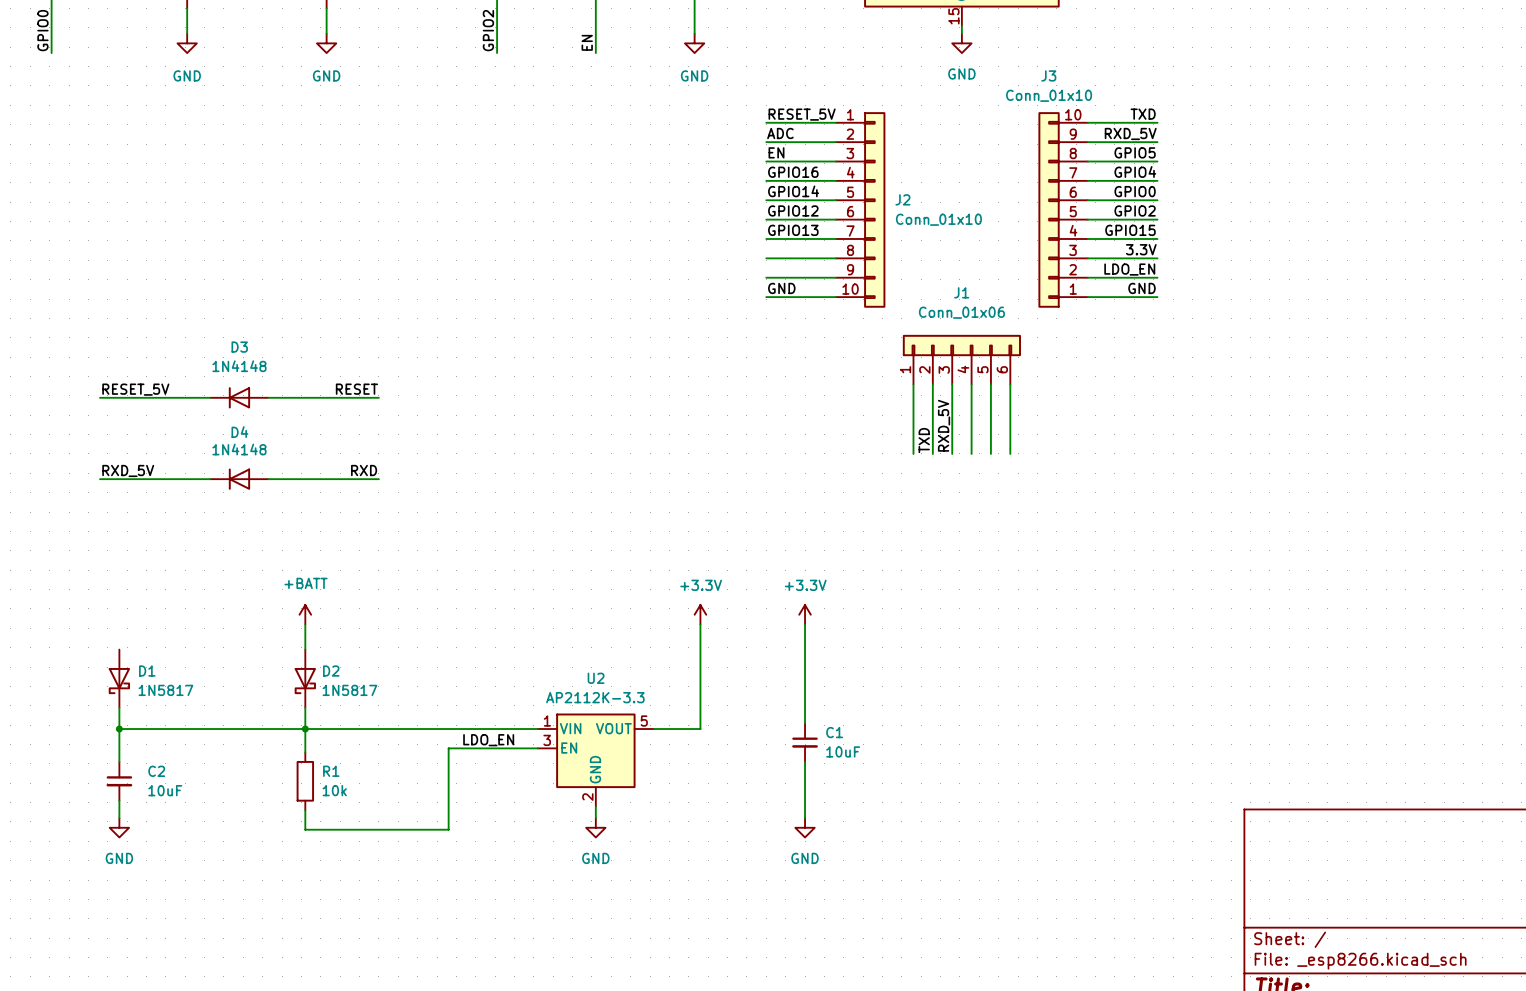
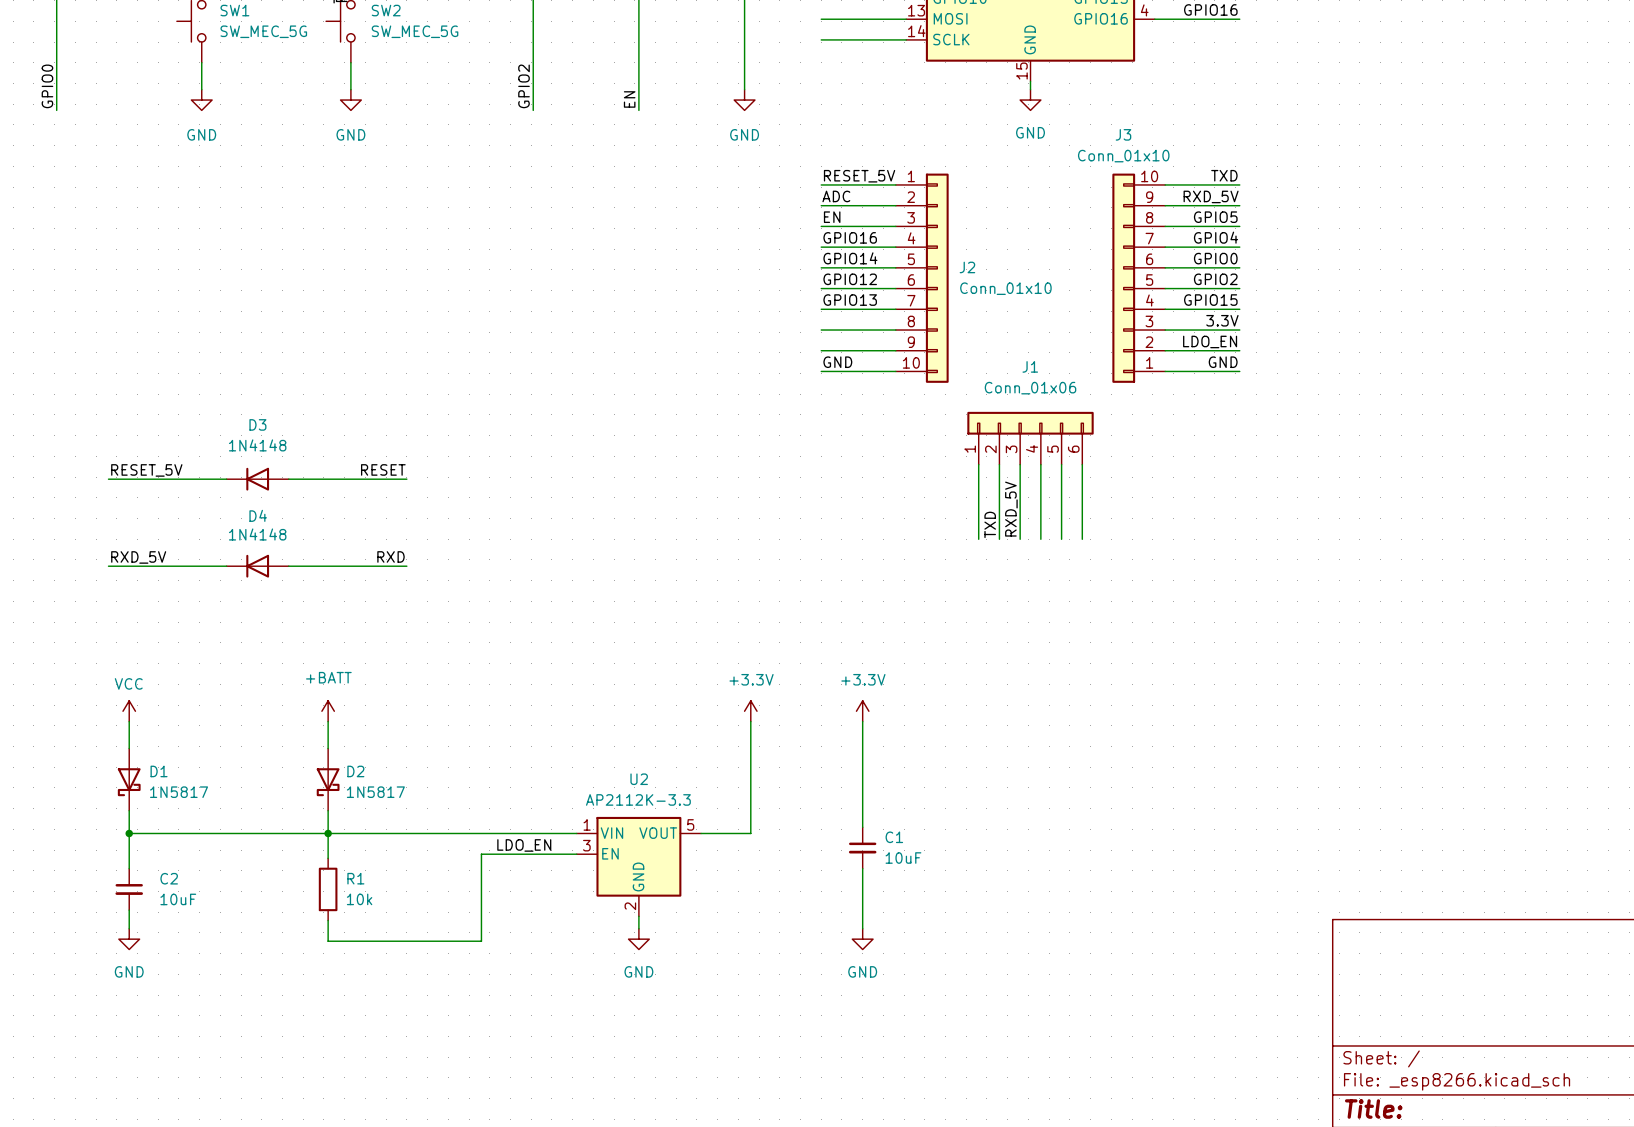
power symbol: none -> VCC (129, 711)
wire: none -> (129, 721) (129, 748)

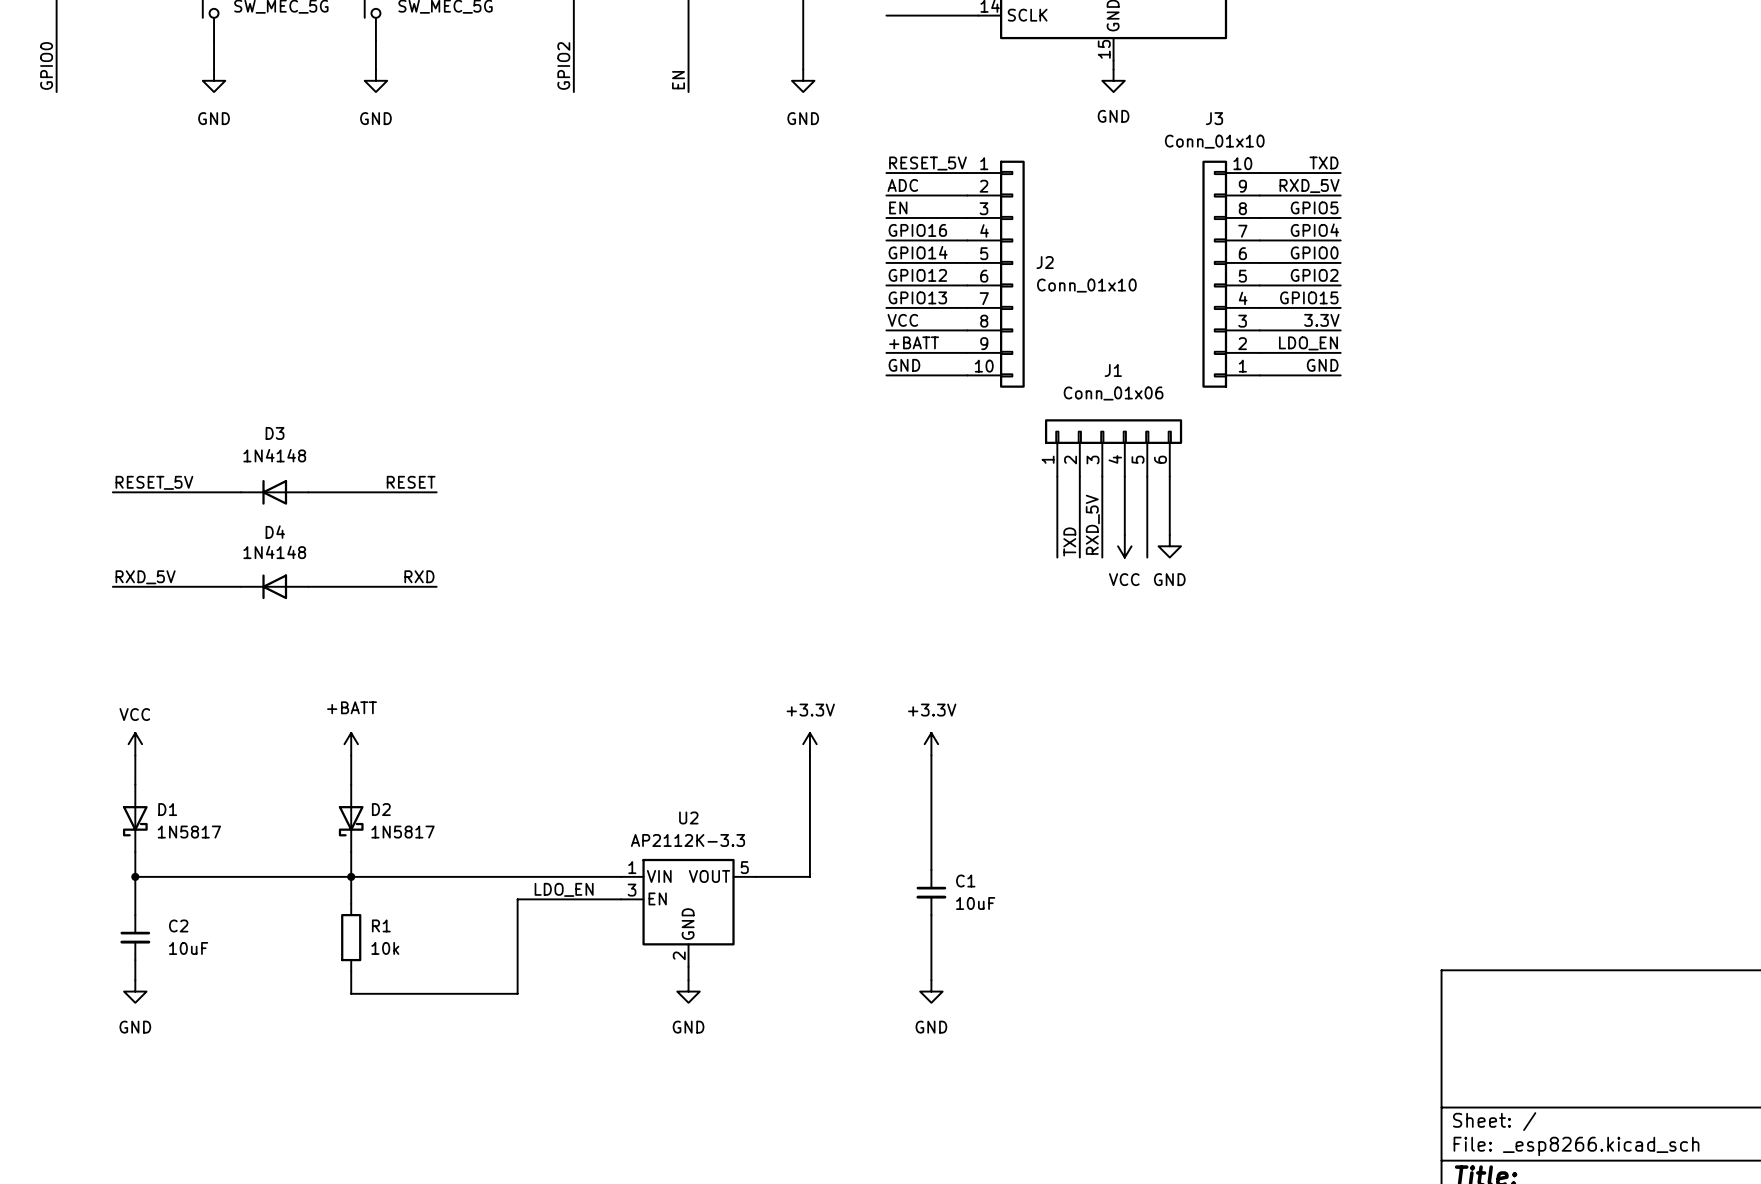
label: none -> VCC (902, 320)
label: none -> +BATT (914, 342)
power symbol: none -> VCC (1124, 546)
power symbol: none -> GND (1169, 546)

